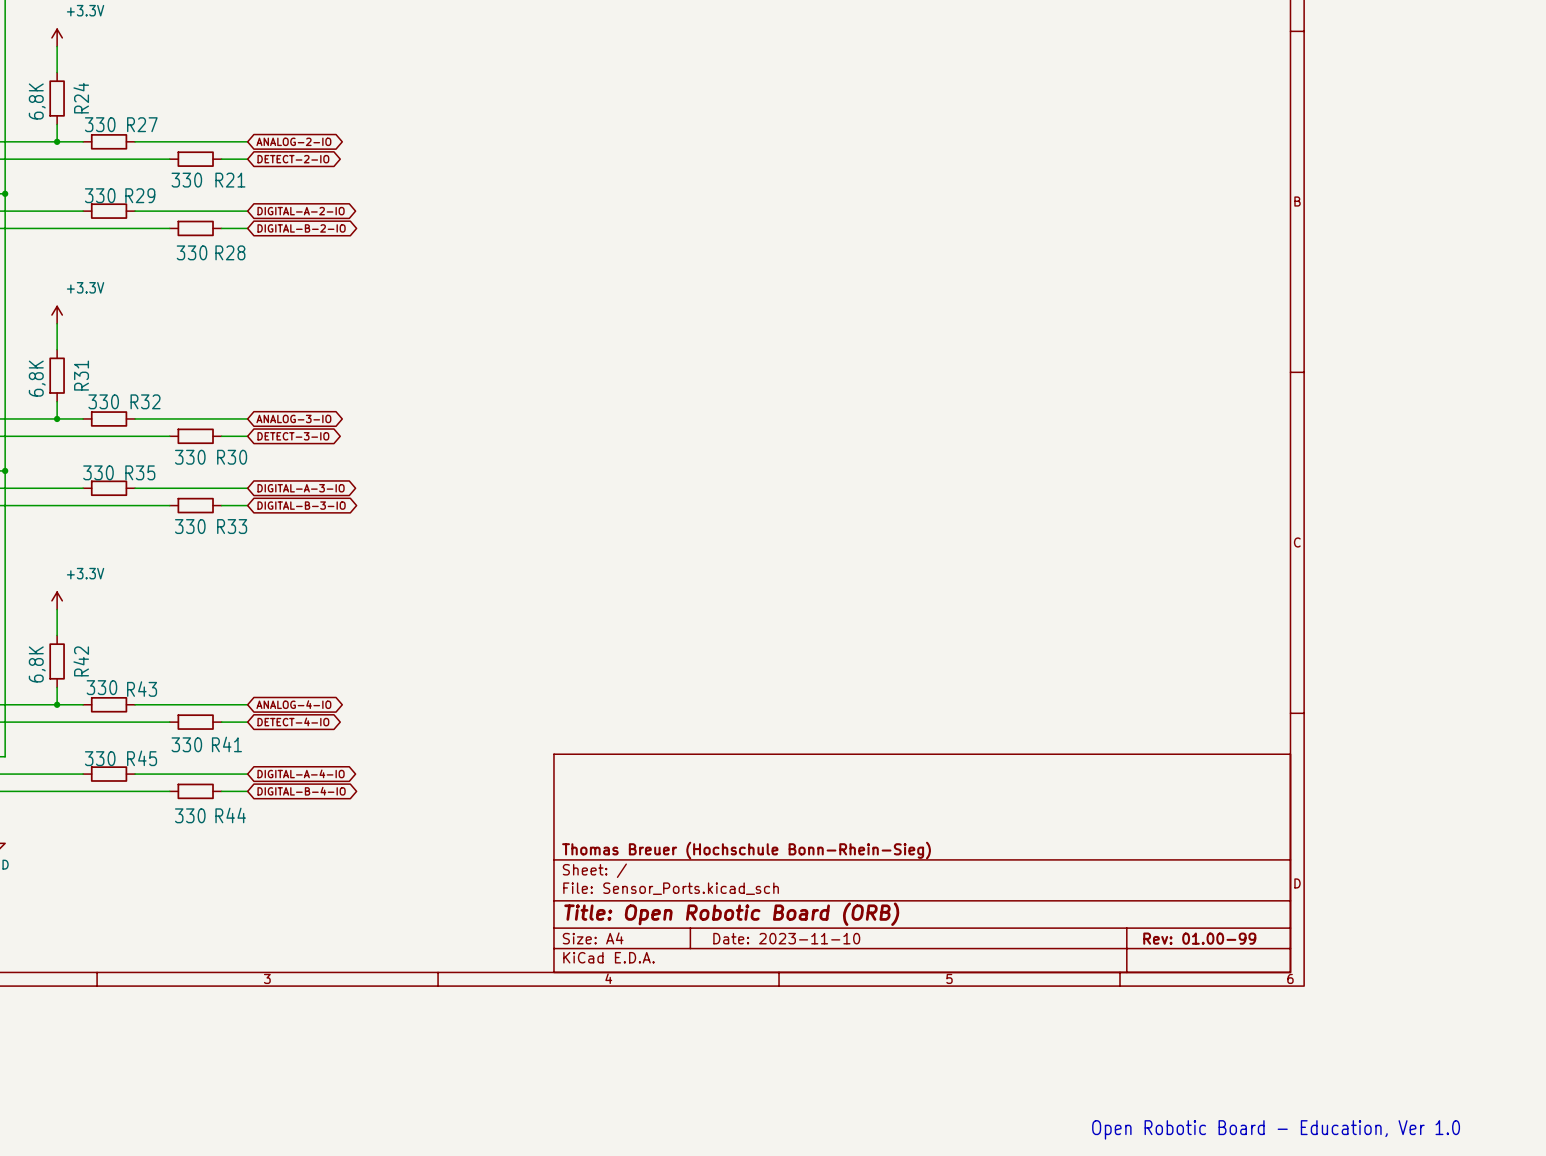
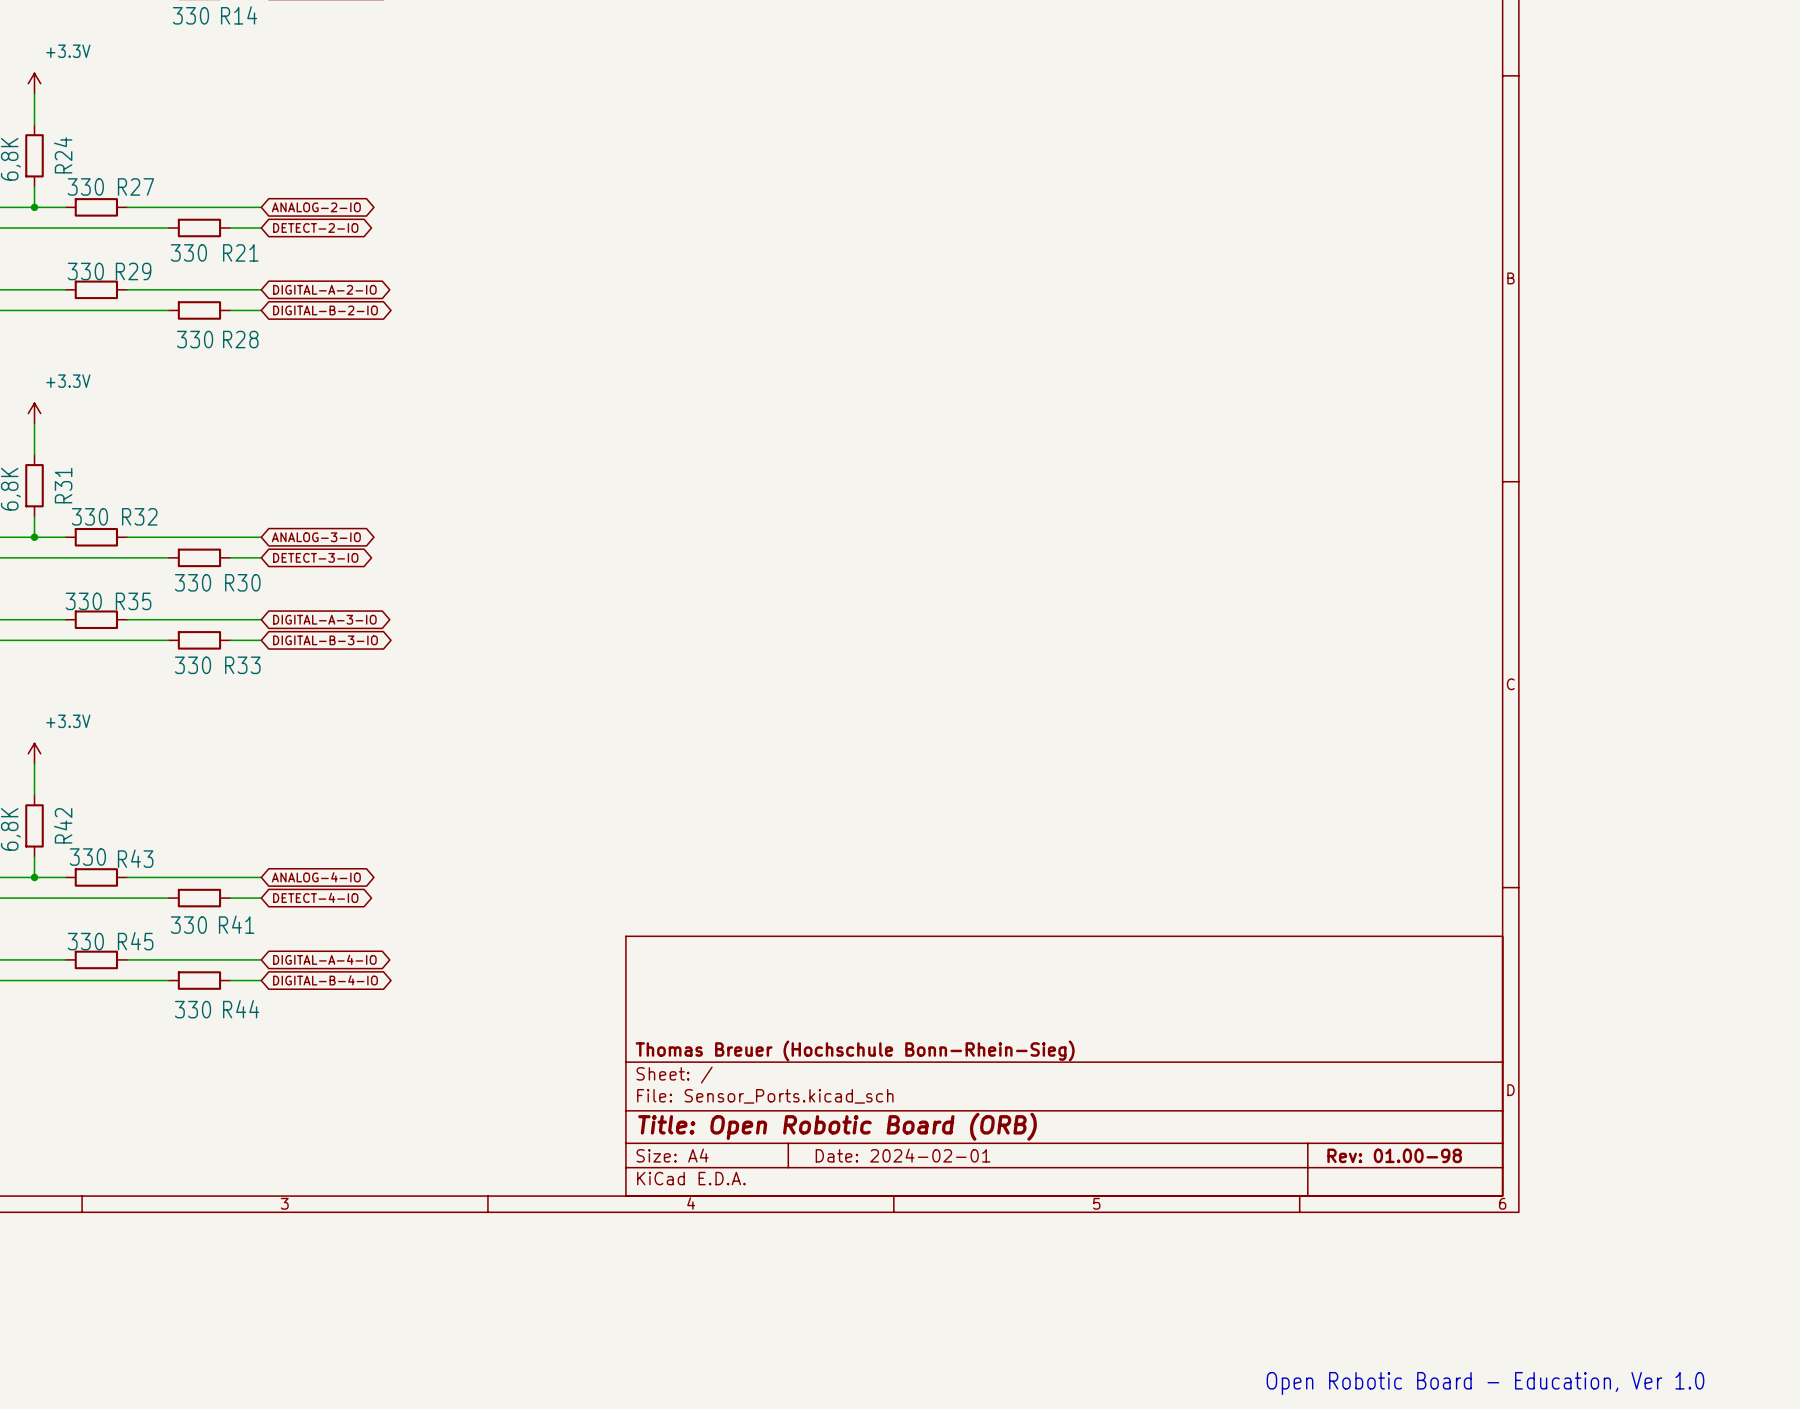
title block: Date: 2023-11-10 (786, 938) -> Date: 2024-02-01 (903, 1155)
title block: Rev: 01.00-99 (1199, 938) -> Rev: 01.00-98 (1394, 1155)

